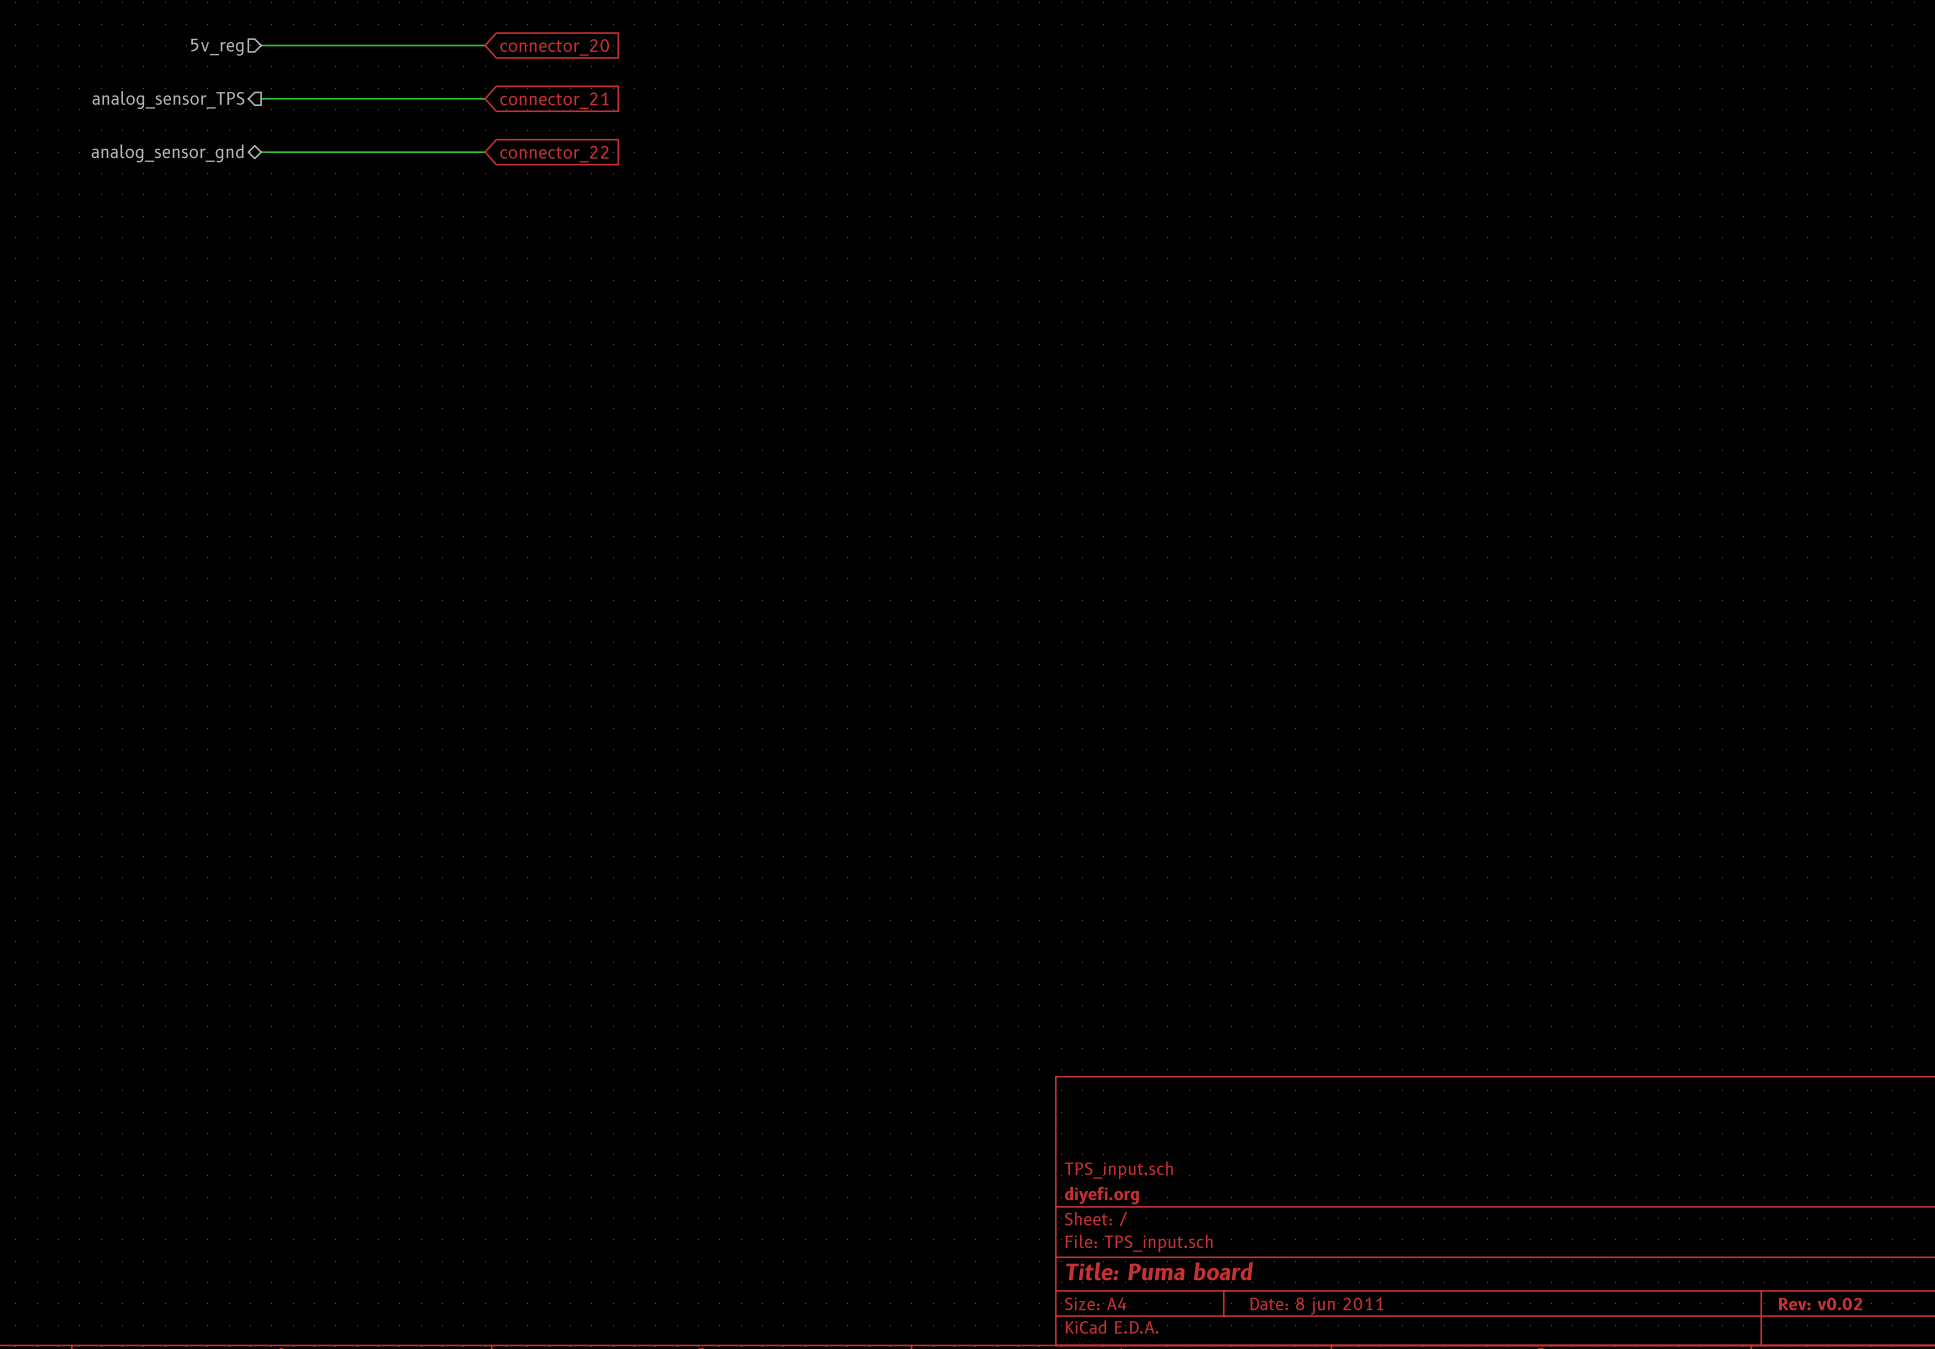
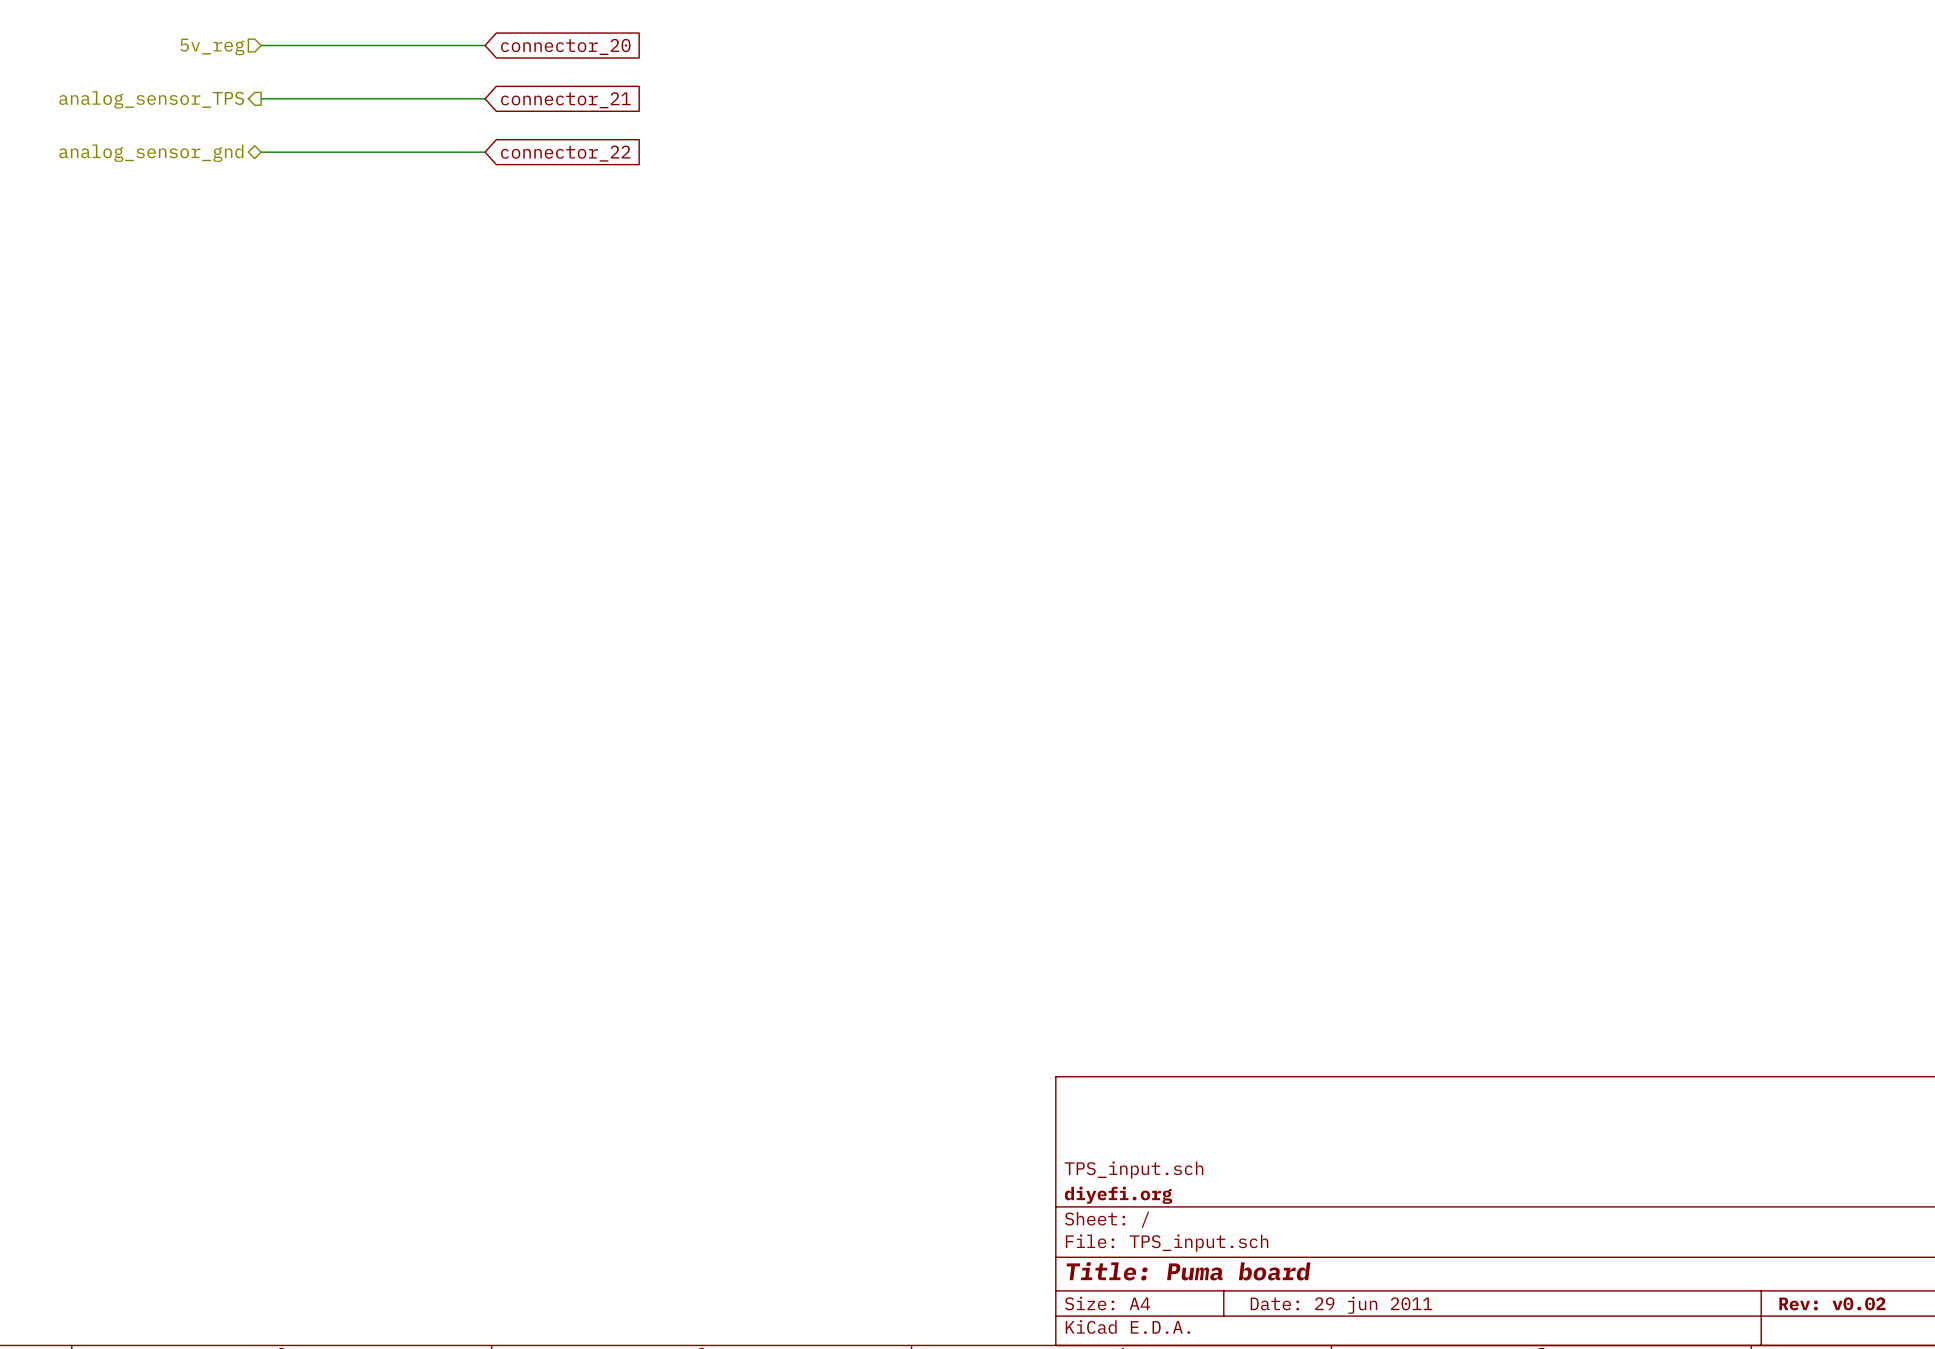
title block: Date: 8 jun 2011 (1316, 1305) -> Date: 29 jun 2011 (1341, 1305)

